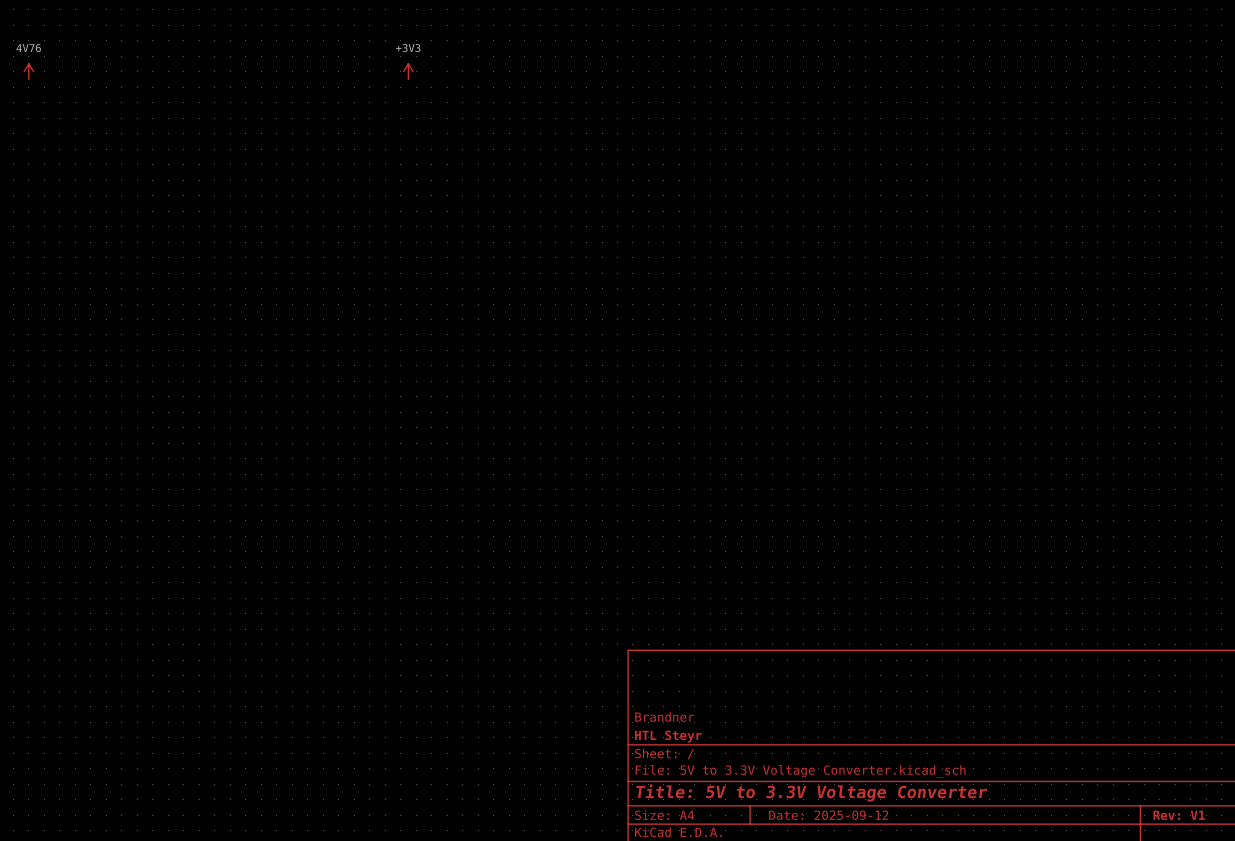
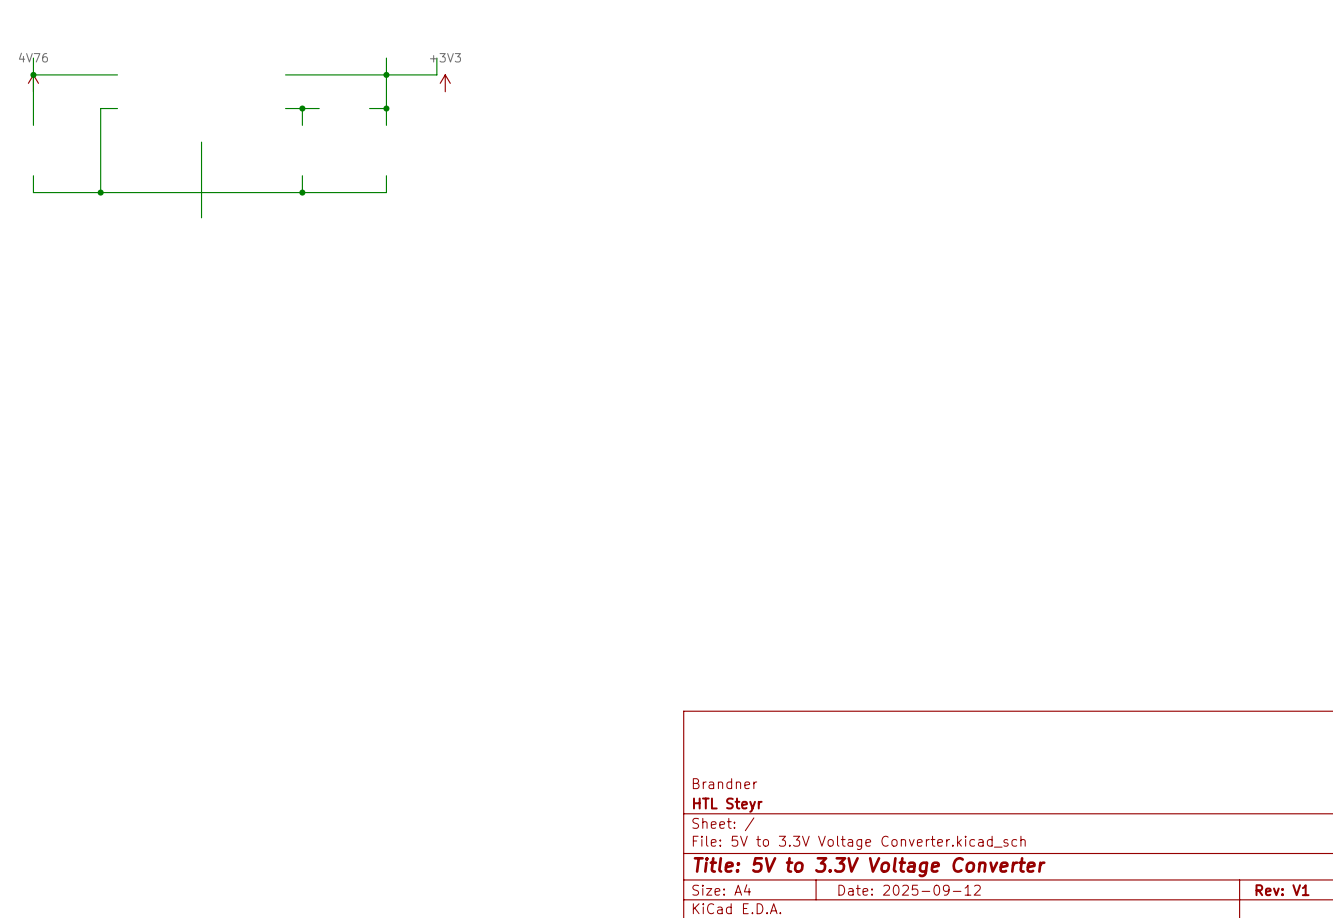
wire: none -> (33, 58) (33, 125)
wire: none -> (386, 58) (386, 125)
wire: none -> (436, 58) (436, 74) (285, 74)
wire: none -> (33, 74) (117, 74)
junction: none -> (33, 74)
junction: none -> (386, 74)
wire: none -> (117, 108) (100, 108) (100, 192)
wire: none -> (285, 108) (319, 108)
wire: none -> (302, 108) (302, 125)
junction: none -> (302, 108)
wire: none -> (369, 108) (386, 108)
junction: none -> (386, 108)
wire: none -> (201, 142) (201, 217)
wire: none -> (33, 175) (33, 192) (386, 192) (386, 175)
wire: none -> (302, 175) (302, 192)
junction: none -> (100, 192)
junction: none -> (302, 192)

